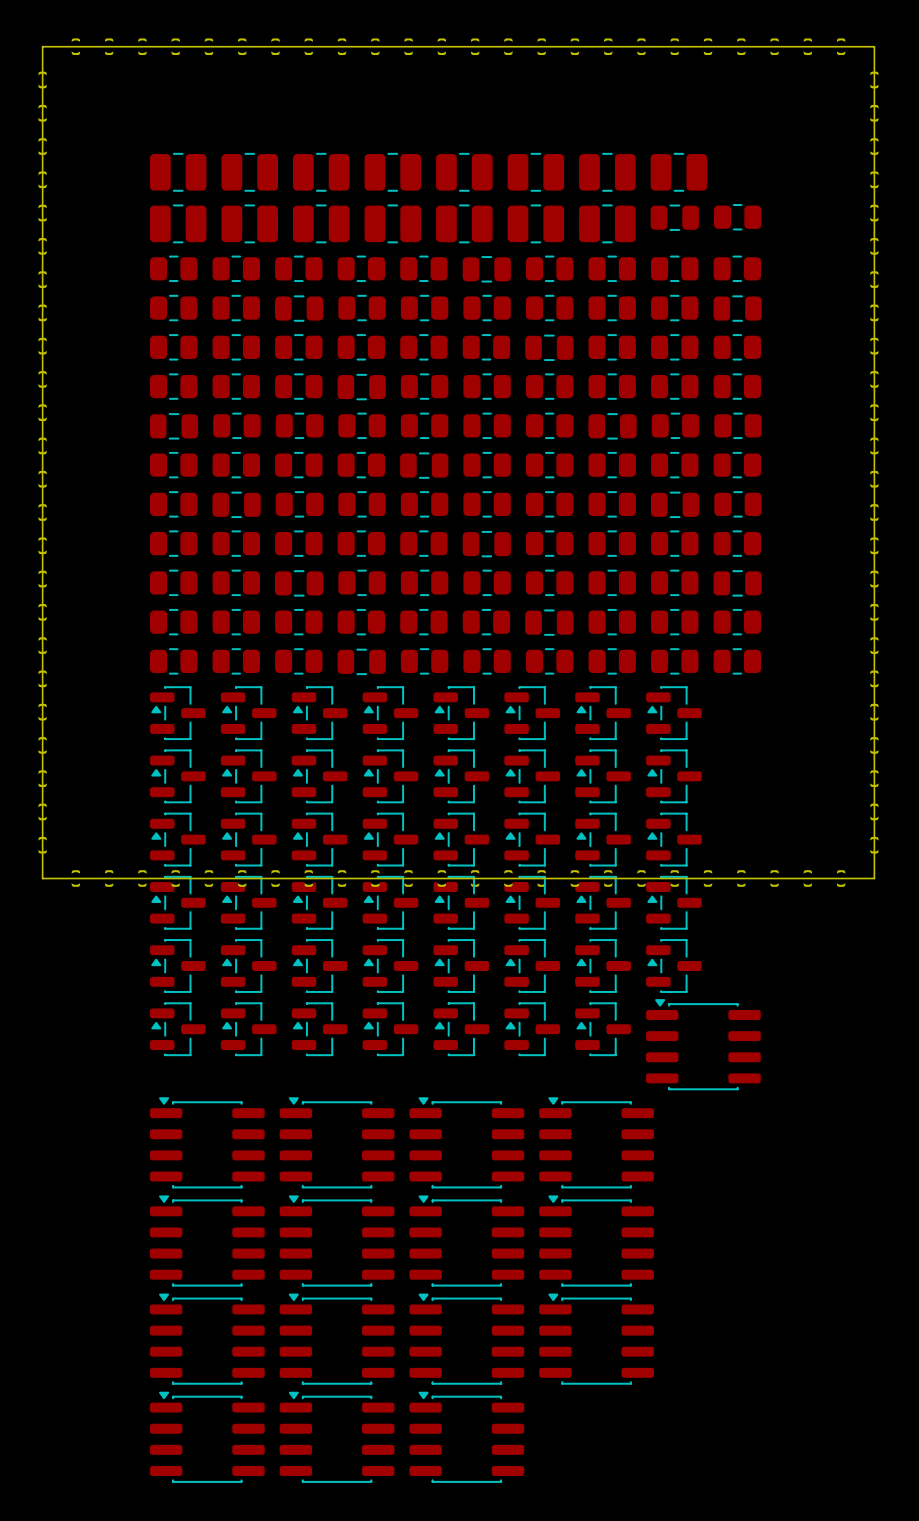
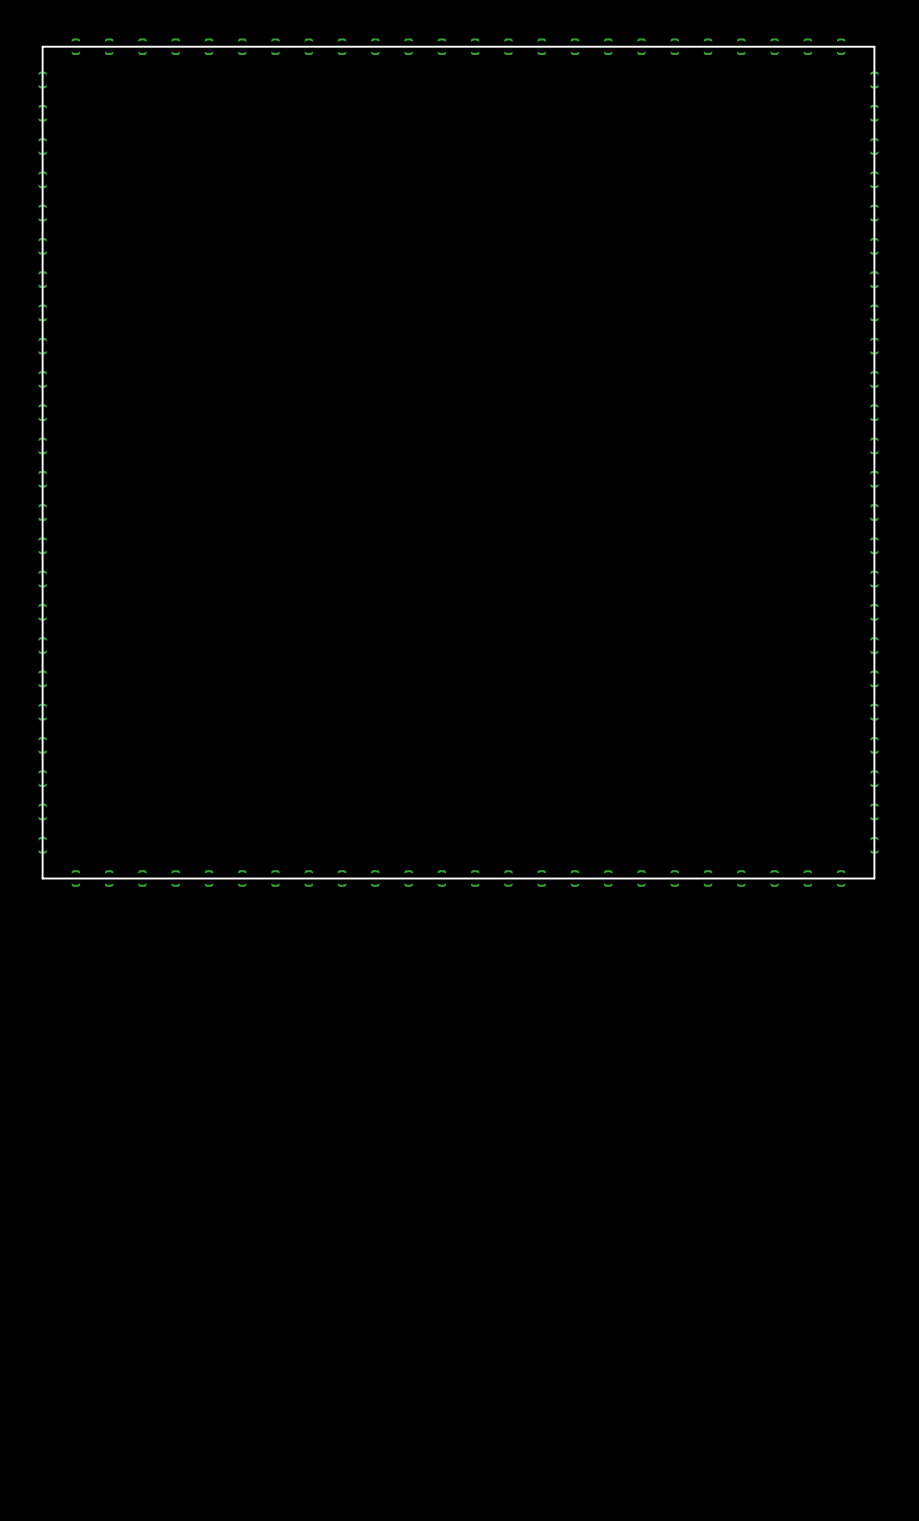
part: (178, 172) -> none
part: (249, 172) -> none
part: (321, 172) -> none
part: (392, 172) -> none
part: (464, 172) -> none
part: (535, 172) -> none
part: (607, 172) -> none
part: (678, 172) -> none
part: (674, 217) -> none
part: (737, 217) -> none
part: (178, 223) -> none
part: (249, 223) -> none
part: (321, 223) -> none
part: (392, 223) -> none
part: (464, 223) -> none
part: (535, 223) -> none
part: (607, 223) -> none
part: (173, 268) -> none
part: (236, 268) -> none
part: (298, 268) -> none
part: (361, 268) -> none
part: (423, 268) -> none
part: (549, 268) -> none
part: (612, 268) -> none
part: (674, 268) -> none
part: (737, 268) -> none
part: (486, 269) -> none
part: (173, 308) -> none
part: (236, 308) -> none
part: (299, 308) -> none
part: (362, 308) -> none
part: (424, 308) -> none
part: (487, 308) -> none
part: (549, 308) -> none
part: (612, 308) -> none
part: (674, 308) -> none
part: (737, 308) -> none
part: (173, 347) -> none
part: (236, 347) -> none
part: (298, 347) -> none
part: (361, 347) -> none
part: (423, 347) -> none
part: (486, 347) -> none
part: (549, 347) -> none
part: (612, 347) -> none
part: (674, 347) -> none
part: (737, 347) -> none
part: (173, 386) -> none
part: (236, 386) -> none
part: (298, 386) -> none
part: (424, 386) -> none
part: (487, 386) -> none
part: (549, 386) -> none
part: (612, 386) -> none
part: (674, 386) -> none
part: (737, 386) -> none
part: (361, 387) -> none
part: (236, 425) -> none
part: (299, 425) -> none
part: (362, 425) -> none
part: (424, 425) -> none
part: (487, 425) -> none
part: (549, 425) -> none
part: (675, 425) -> none
part: (737, 425) -> none
part: (174, 426) -> none
part: (612, 426) -> none
part: (173, 465) -> none
part: (236, 465) -> none
part: (298, 465) -> none
part: (361, 465) -> none
part: (424, 465) -> none
part: (487, 465) -> none
part: (549, 465) -> none
part: (612, 465) -> none
part: (674, 465) -> none
part: (737, 465) -> none
part: (173, 504) -> none
part: (236, 504) -> none
part: (299, 504) -> none
part: (362, 504) -> none
part: (424, 504) -> none
part: (487, 504) -> none
part: (549, 504) -> none
part: (612, 504) -> none
part: (675, 504) -> none
part: (737, 504) -> none
part: (173, 543) -> none
part: (236, 543) -> none
part: (298, 543) -> none
part: (361, 543) -> none
part: (423, 543) -> none
part: (549, 543) -> none
part: (612, 543) -> none
part: (674, 543) -> none
part: (737, 543) -> none
part: (486, 544) -> none
part: (173, 582) -> none
part: (236, 582) -> none
part: (362, 582) -> none
part: (424, 582) -> none
part: (487, 582) -> none
part: (549, 582) -> none
part: (612, 582) -> none
part: (674, 582) -> none
part: (299, 583) -> none
part: (737, 583) -> none
part: (173, 622) -> none
part: (236, 622) -> none
part: (298, 622) -> none
part: (361, 622) -> none
part: (423, 622) -> none
part: (486, 622) -> none
part: (549, 622) -> none
part: (612, 622) -> none
part: (674, 622) -> none
part: (737, 622) -> none
part: (173, 661) -> none
part: (236, 661) -> none
part: (298, 661) -> none
part: (361, 661) -> none
part: (424, 661) -> none
part: (487, 661) -> none
part: (549, 661) -> none
part: (612, 661) -> none
part: (674, 661) -> none
part: (737, 661) -> none
part: (177, 713) -> none
part: (248, 713) -> none
part: (319, 713) -> none
part: (390, 713) -> none
part: (461, 713) -> none
part: (532, 713) -> none
part: (603, 713) -> none
part: (673, 713) -> none
part: (177, 776) -> none
part: (248, 776) -> none
part: (319, 776) -> none
part: (390, 776) -> none
part: (461, 776) -> none
part: (532, 776) -> none
part: (603, 776) -> none
part: (673, 776) -> none
part: (177, 839) -> none
part: (248, 839) -> none
part: (319, 839) -> none
part: (390, 839) -> none
part: (461, 839) -> none
part: (532, 839) -> none
part: (603, 839) -> none
part: (673, 839) -> none
part: (177, 902) -> none
part: (248, 902) -> none
part: (319, 902) -> none
part: (390, 902) -> none
part: (461, 902) -> none
part: (532, 902) -> none
part: (603, 902) -> none
part: (673, 902) -> none
part: (177, 966) -> none
part: (248, 966) -> none
part: (319, 966) -> none
part: (390, 966) -> none
part: (461, 966) -> none
part: (532, 966) -> none
part: (603, 966) -> none
part: (673, 966) -> none
part: (177, 1029) -> none
part: (248, 1029) -> none
part: (319, 1029) -> none
part: (390, 1029) -> none
part: (461, 1029) -> none
part: (532, 1029) -> none
part: (603, 1029) -> none
part: (703, 1044) -> none
part: (207, 1142) -> none
part: (337, 1142) -> none
part: (466, 1142) -> none
part: (596, 1142) -> none
part: (207, 1240) -> none
part: (337, 1240) -> none
part: (466, 1240) -> none
part: (596, 1240) -> none
part: (207, 1339) -> none
part: (337, 1339) -> none
part: (466, 1339) -> none
part: (596, 1339) -> none
part: (207, 1437) -> none
part: (337, 1437) -> none
part: (466, 1437) -> none

